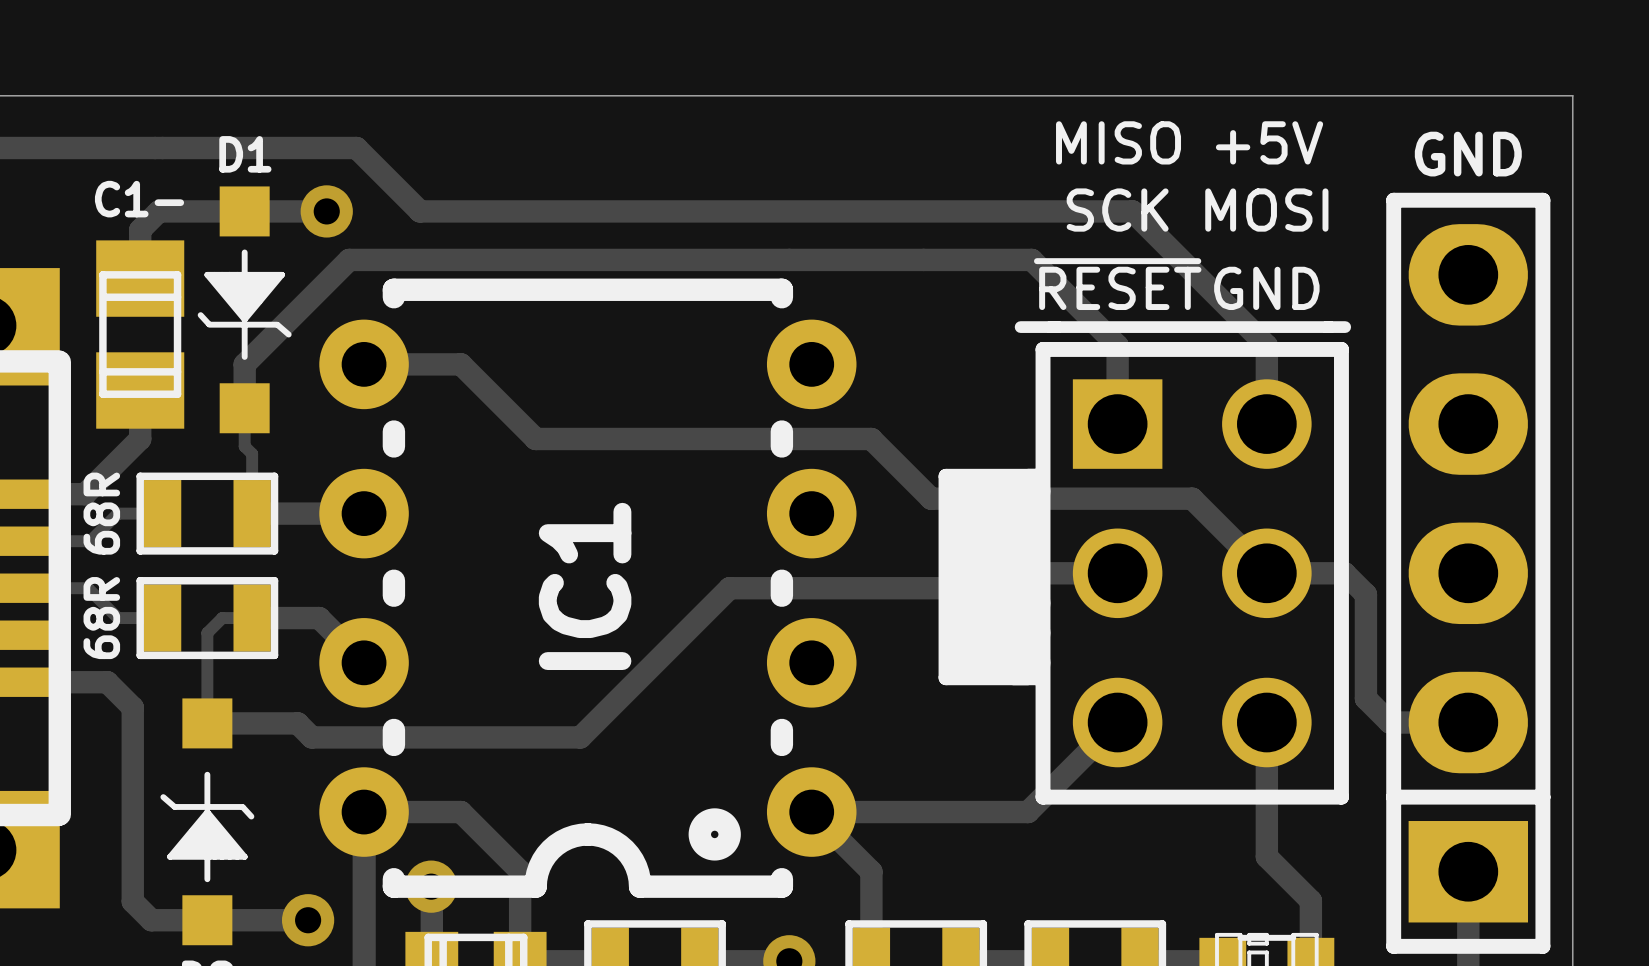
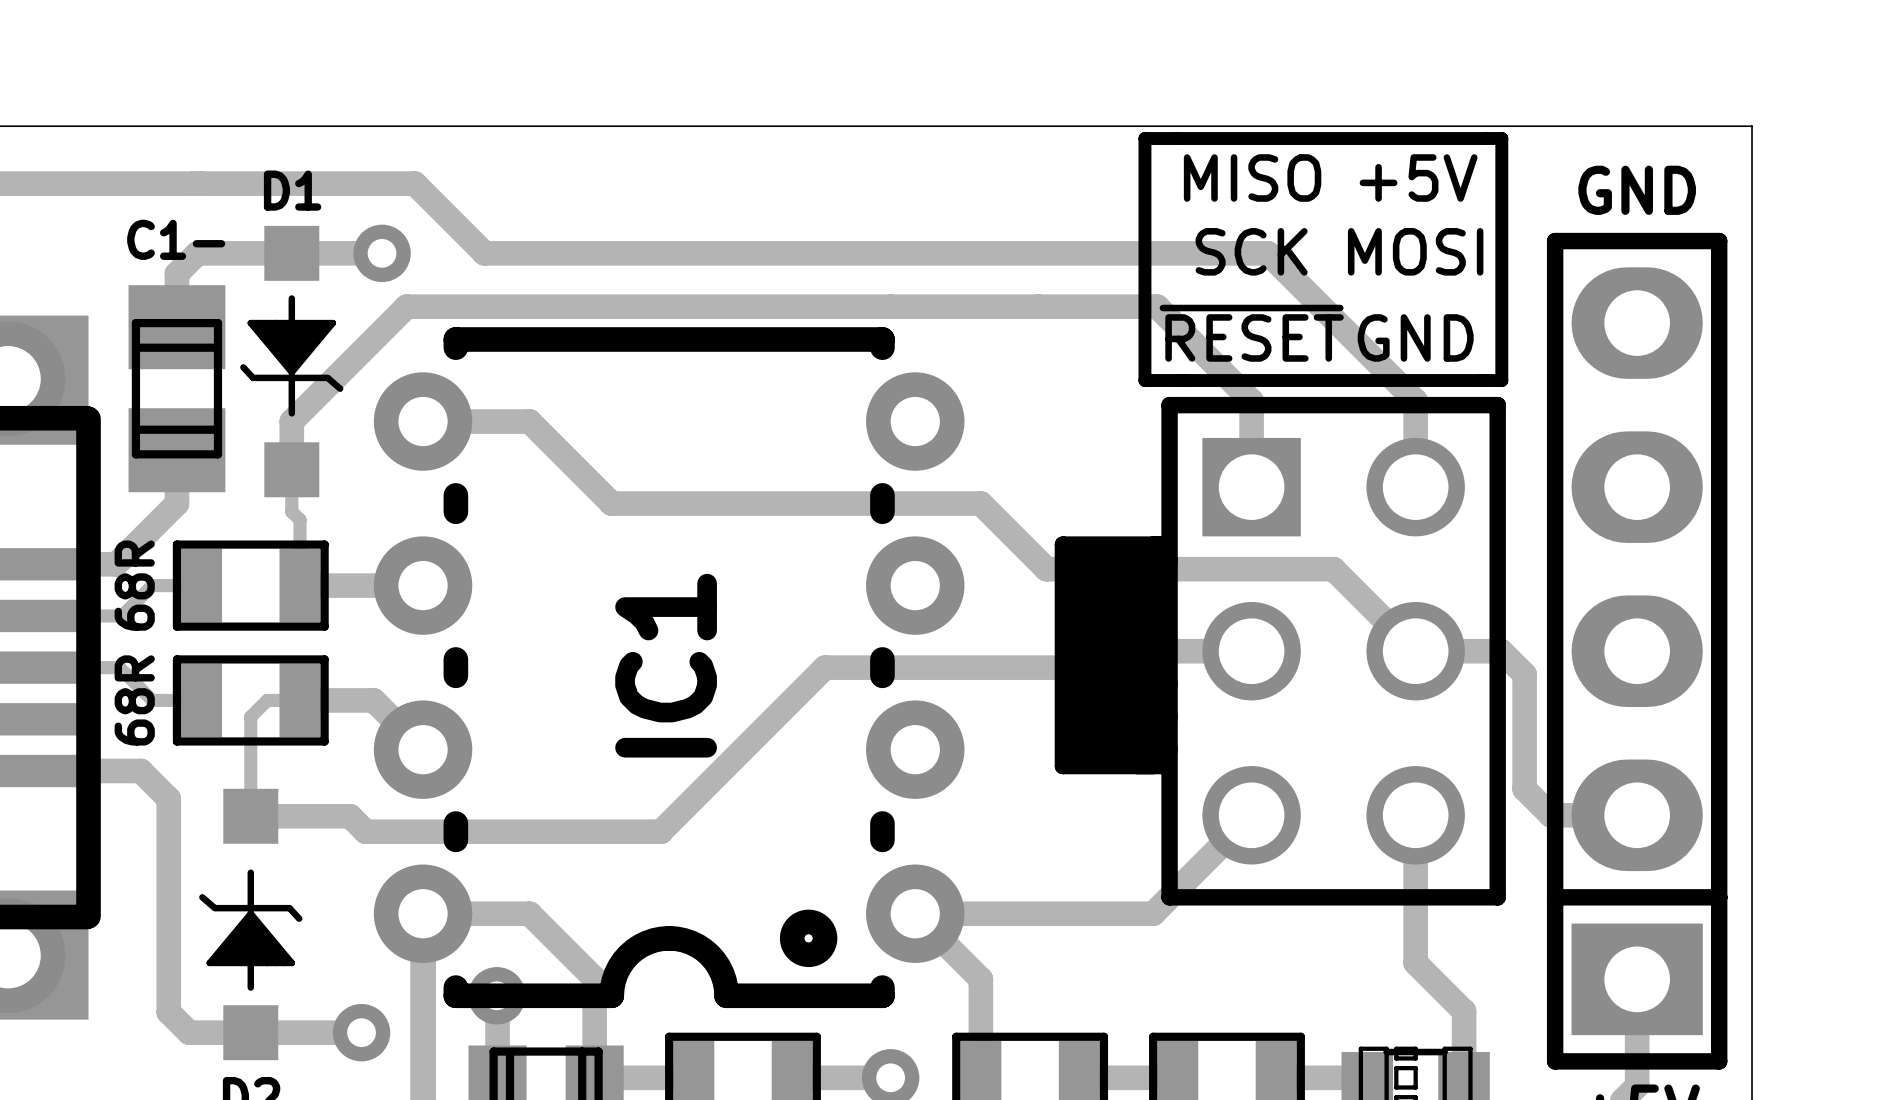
line: none -> (1144, 380) (1144, 138) (1501, 138) (1501, 380)

